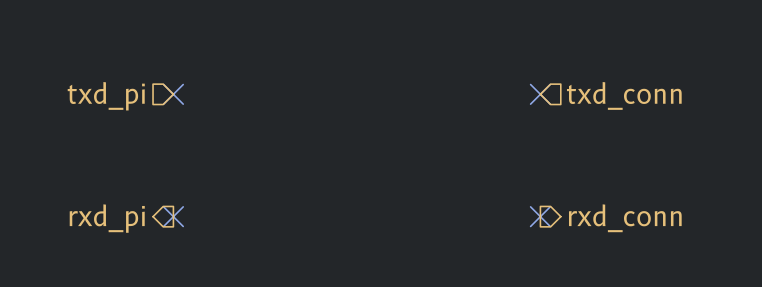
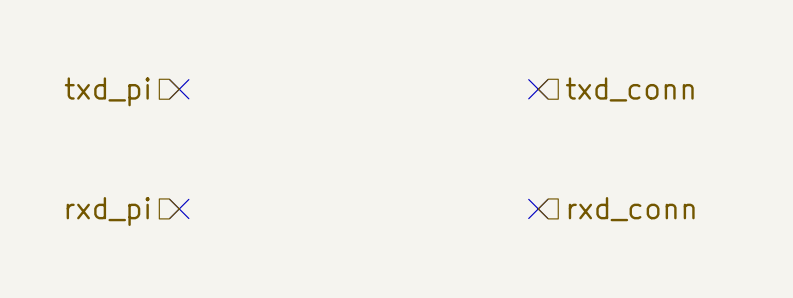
hierarchical label shape: output (107, 218) -> input (108, 211)
hierarchical label shape: output (625, 218) -> input (631, 209)

